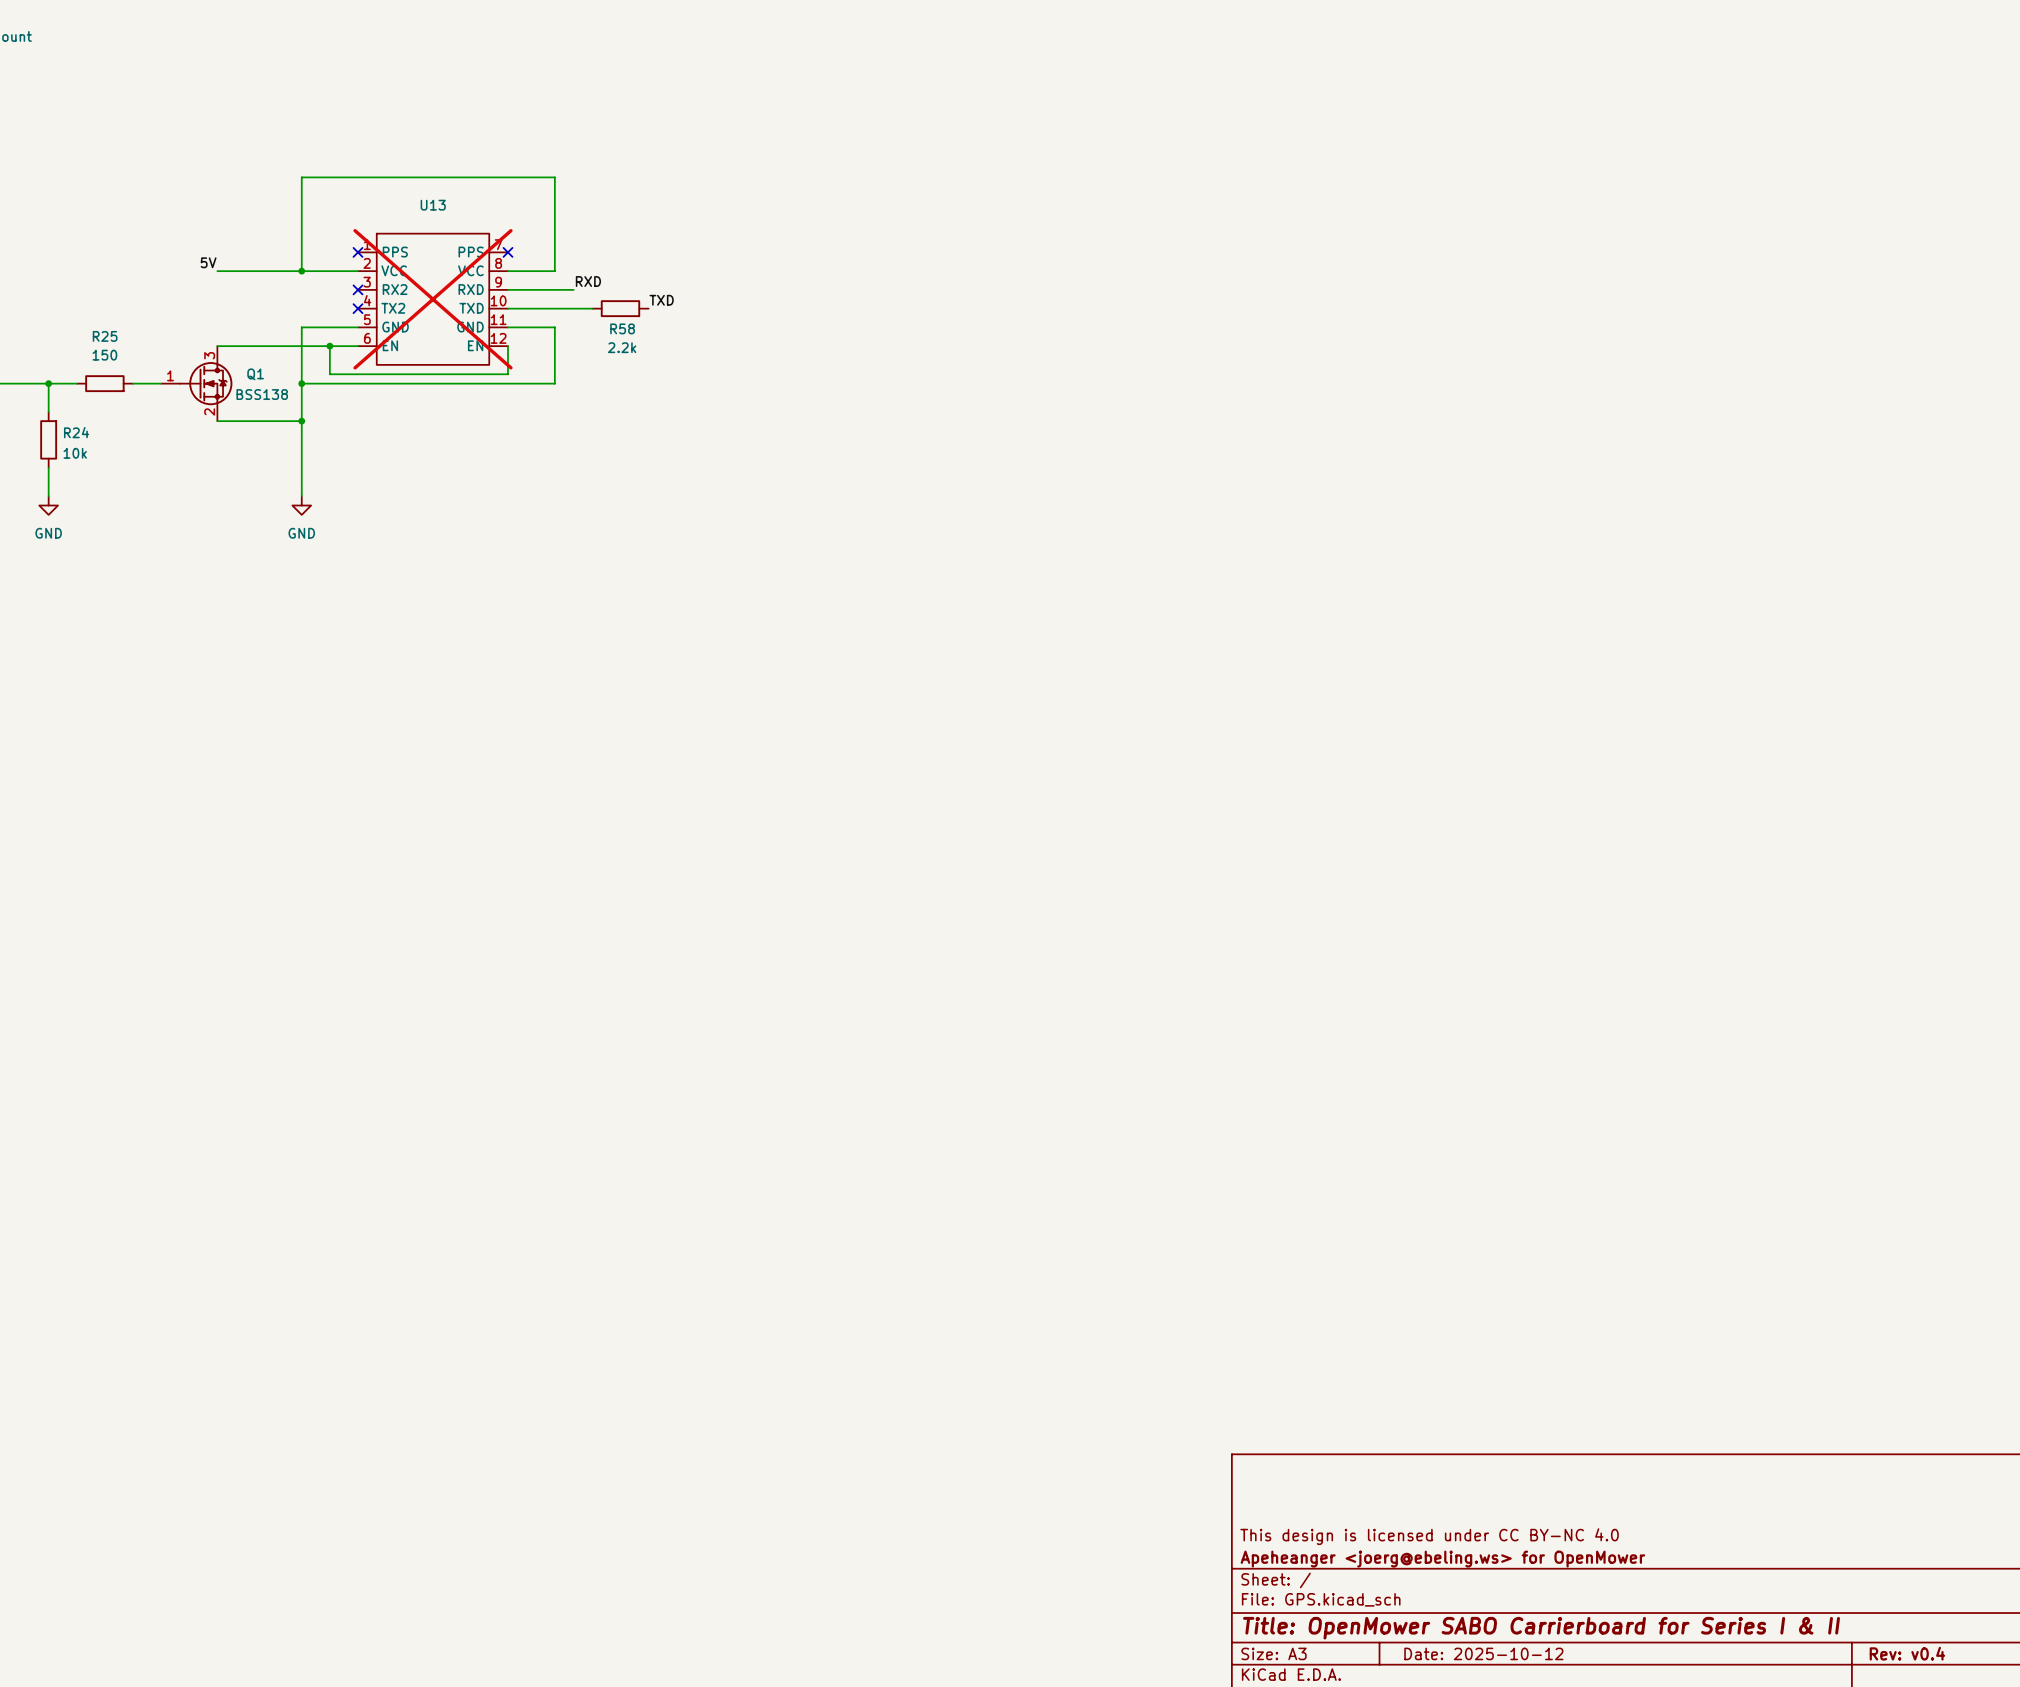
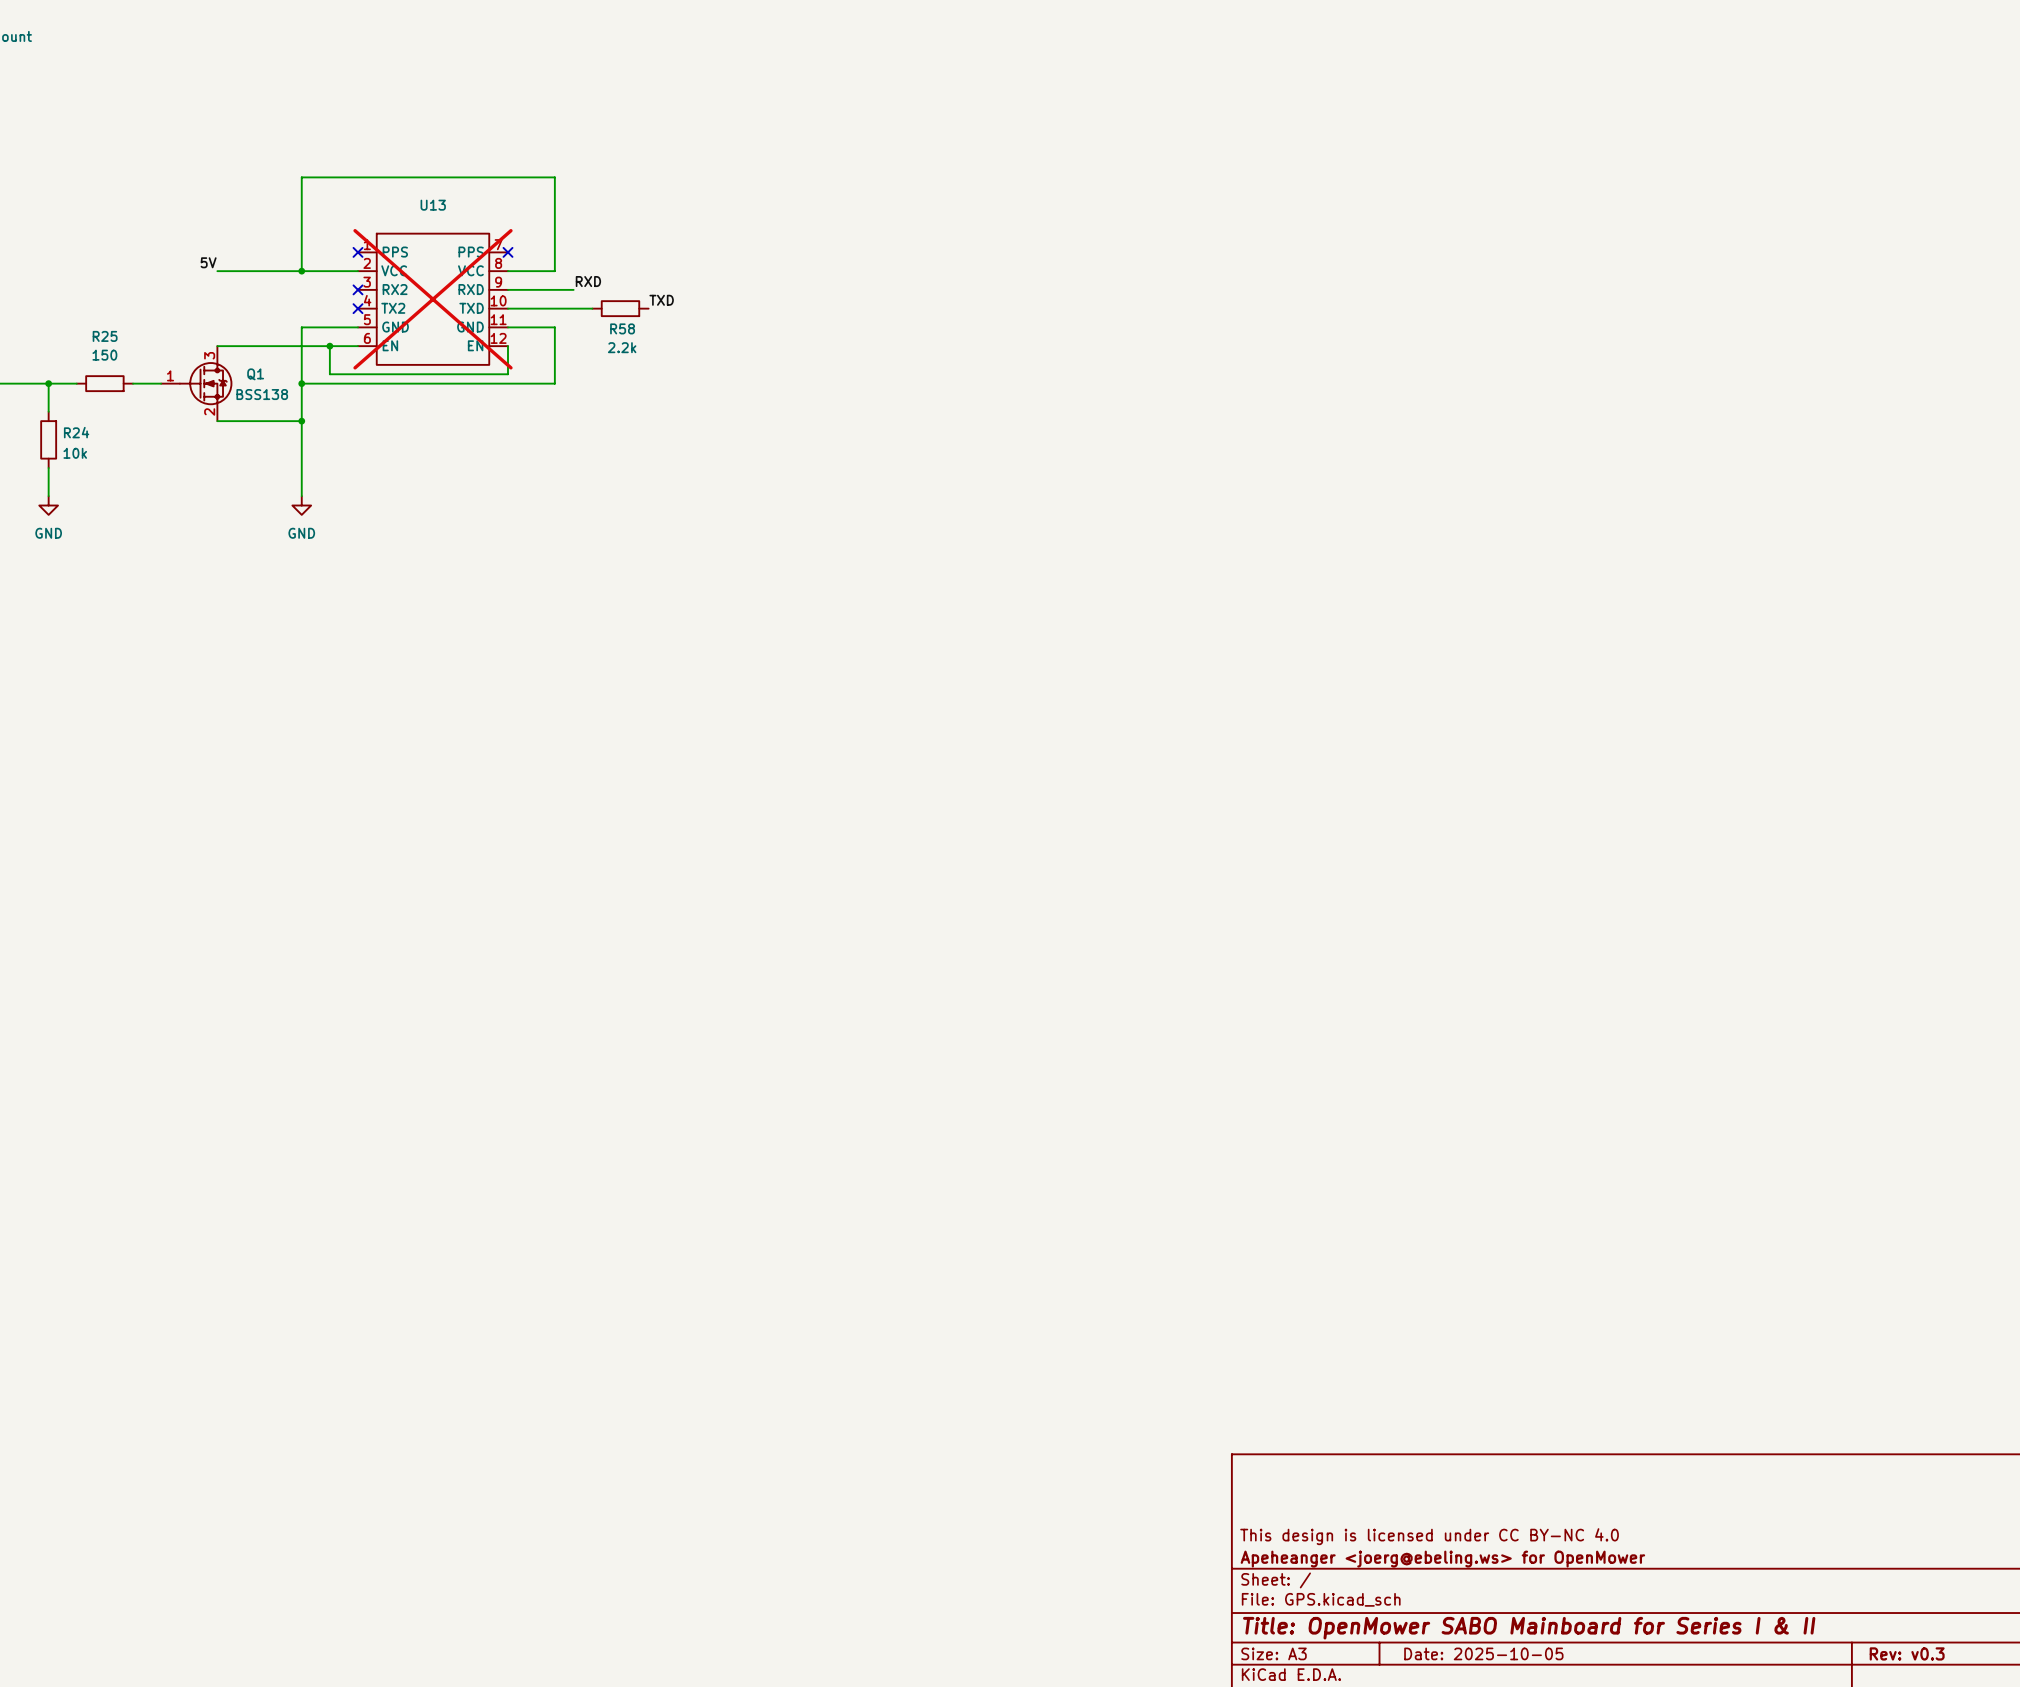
title block: Title: OpenMower SABO Carrierboard for Series I & II (1541, 1628) -> Title: OpenMower SABO Mainboard for Series I & II (1529, 1628)
title block: Date: 2025-10-12 (1483, 1653) -> Date: 2025-10-05 (1483, 1653)
title block: Rev: v0.4 (1907, 1653) -> Rev: v0.3 (1907, 1653)

